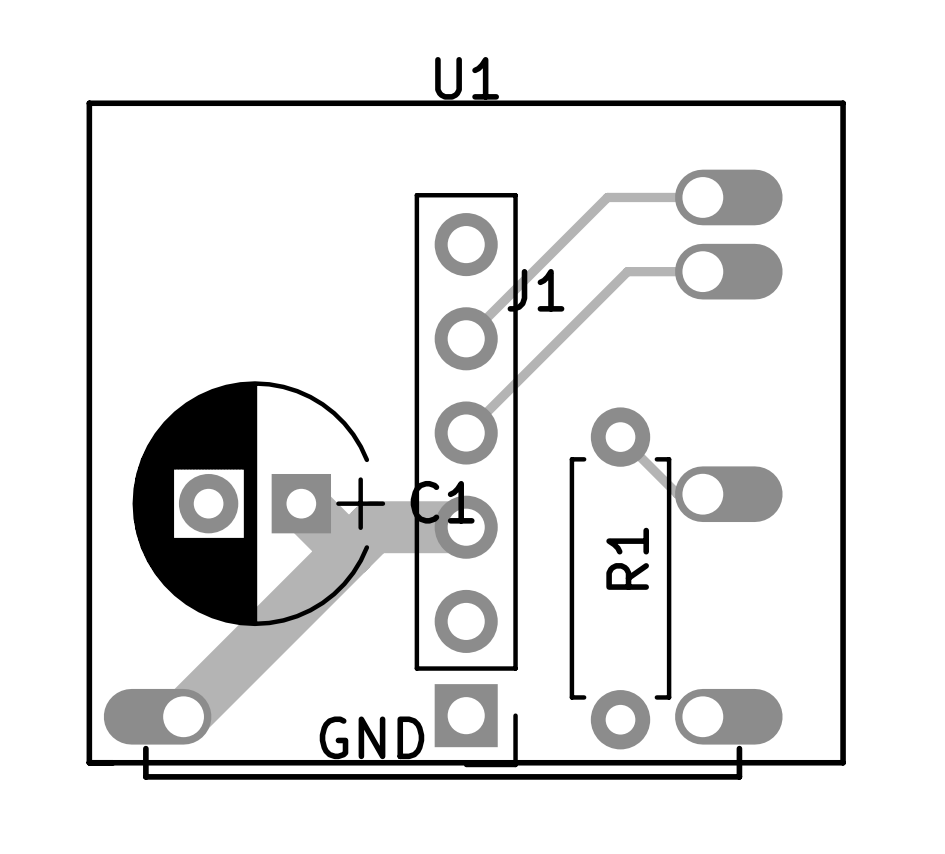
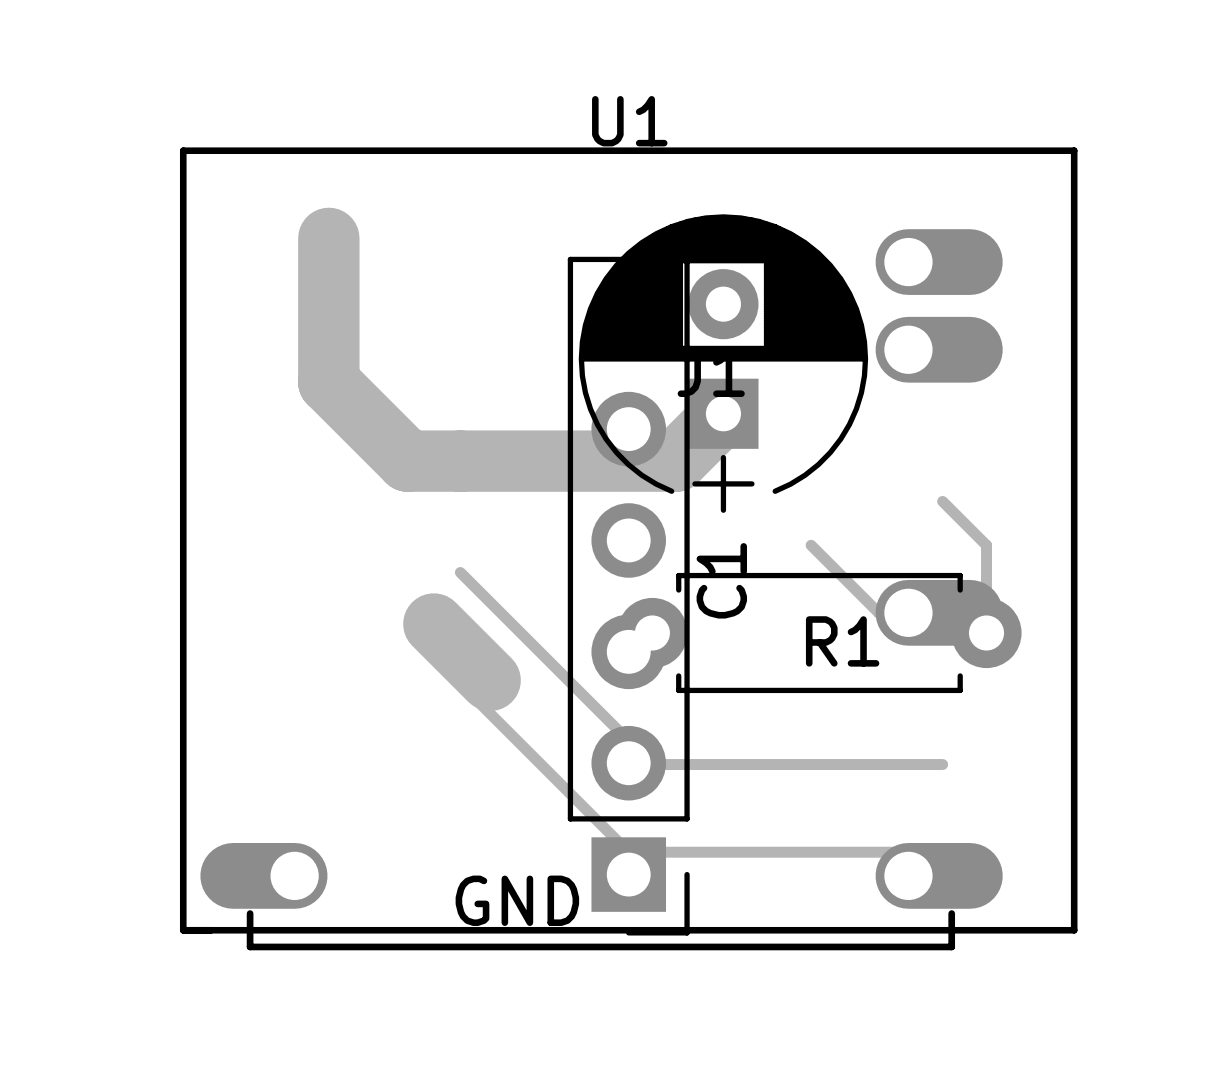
track: none -> (328, 238) (328, 382) (407, 461) (676, 461) (723, 413)
track: (691, 186) (702, 197) (607, 197) (466, 338) -> none
track: (702, 271) (627, 271) (466, 433) -> none
track: none -> (942, 501) (986, 545) (986, 632)
track: none -> (460, 572) (652, 764) (942, 764)
C1 rotation: 0° (258, 503) -> 90° clockwise (723, 363)
C1 position: (258, 503) -> (723, 363)
track: (466, 527) (373, 527) (183, 716) -> none
track: none -> (460, 683) (628, 852) (942, 852)
R1 rotation: 0° (620, 578) -> 90° clockwise (819, 632)

